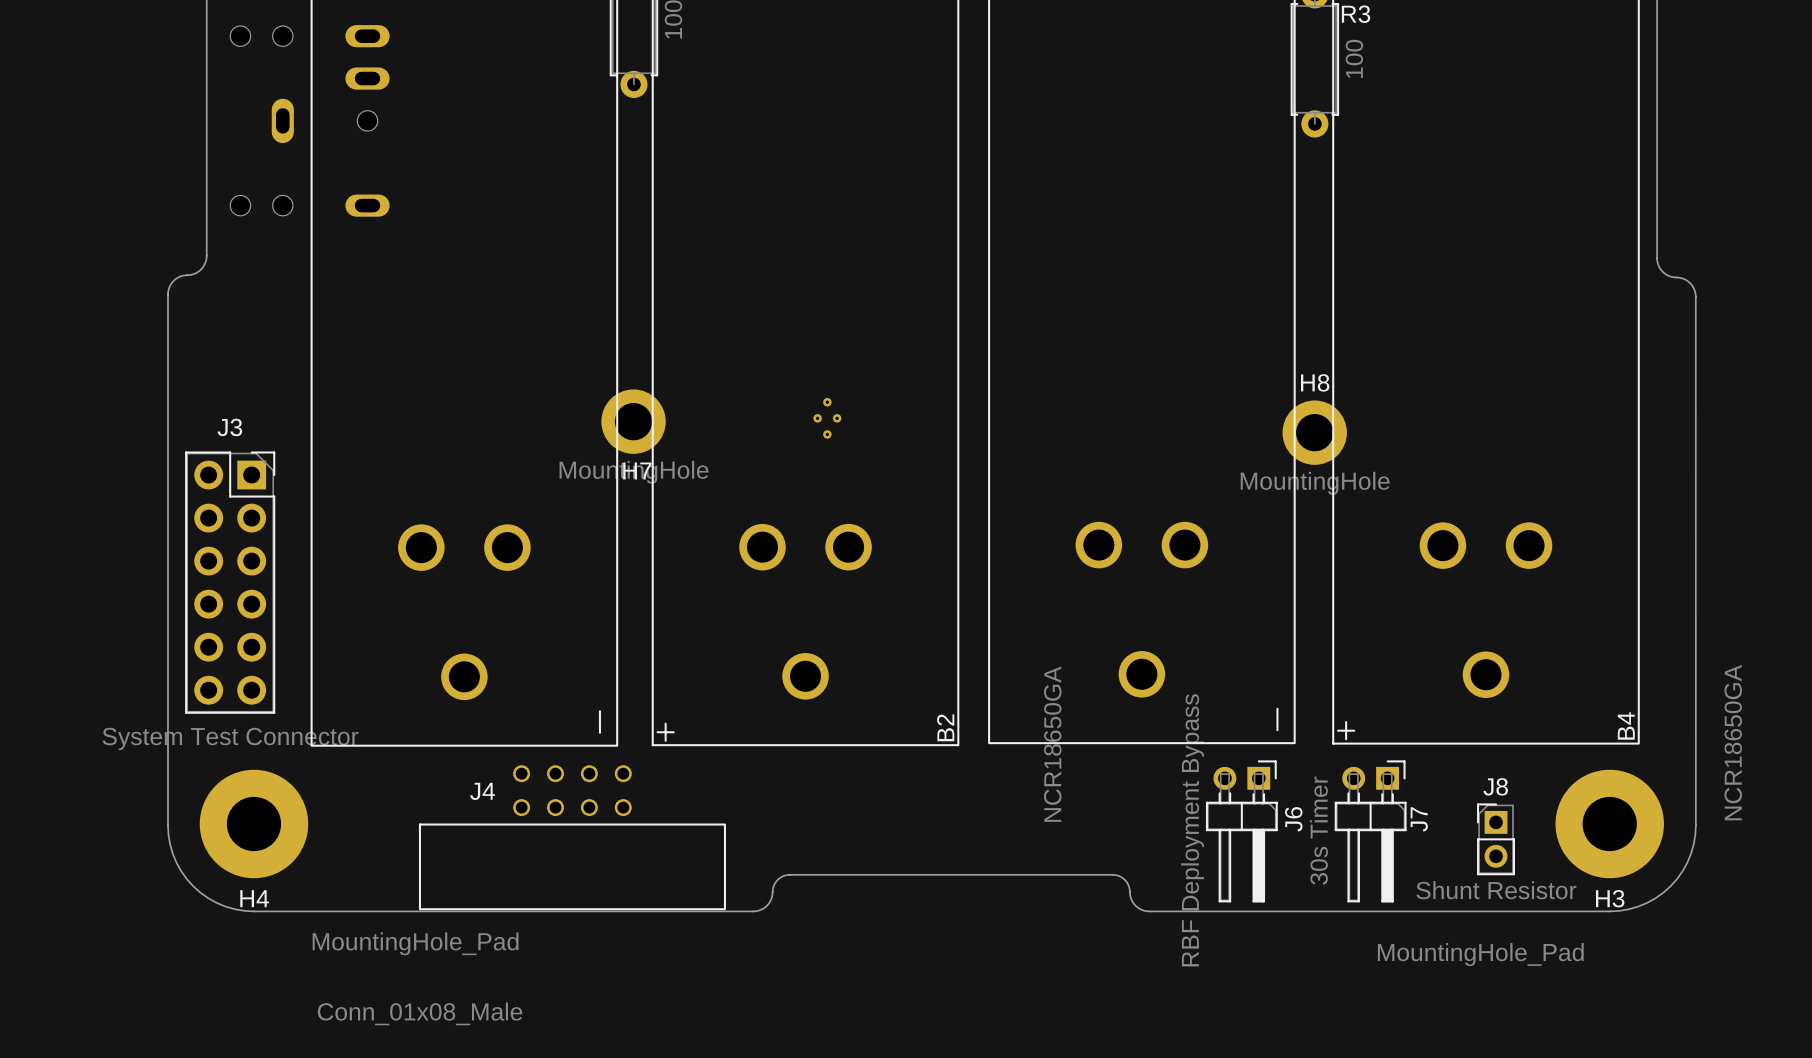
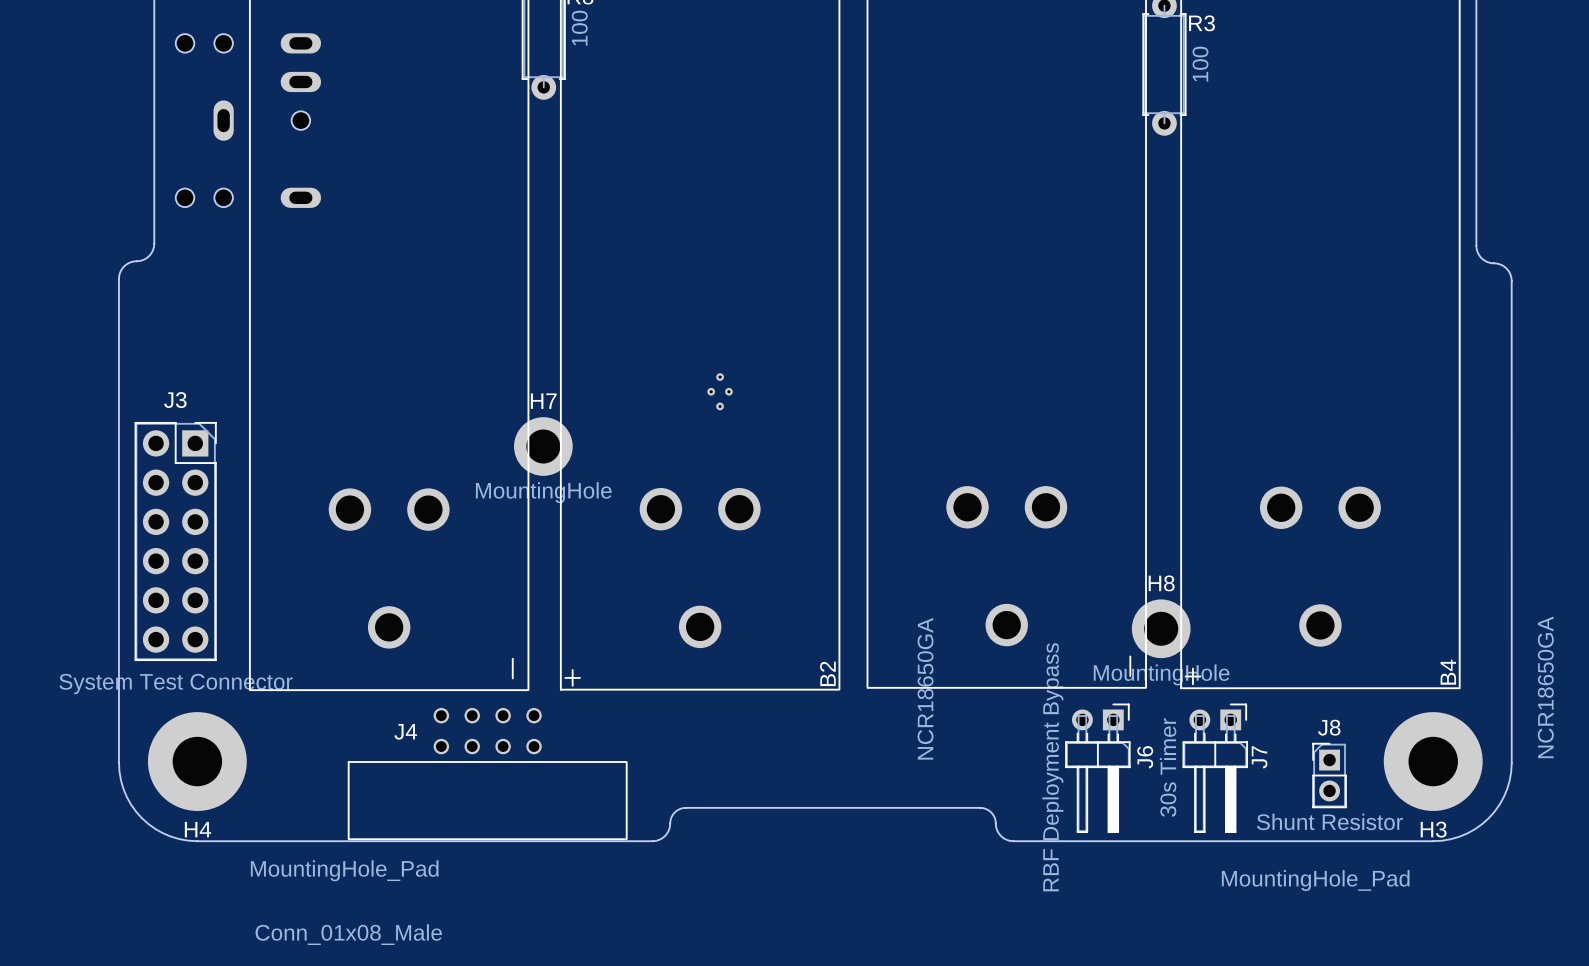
H7 position: (633, 421) -> (543, 446)
H8 position: (1314, 432) -> (1161, 628)
H7 name position: H7 (637, 471) -> H7 (543, 401)

